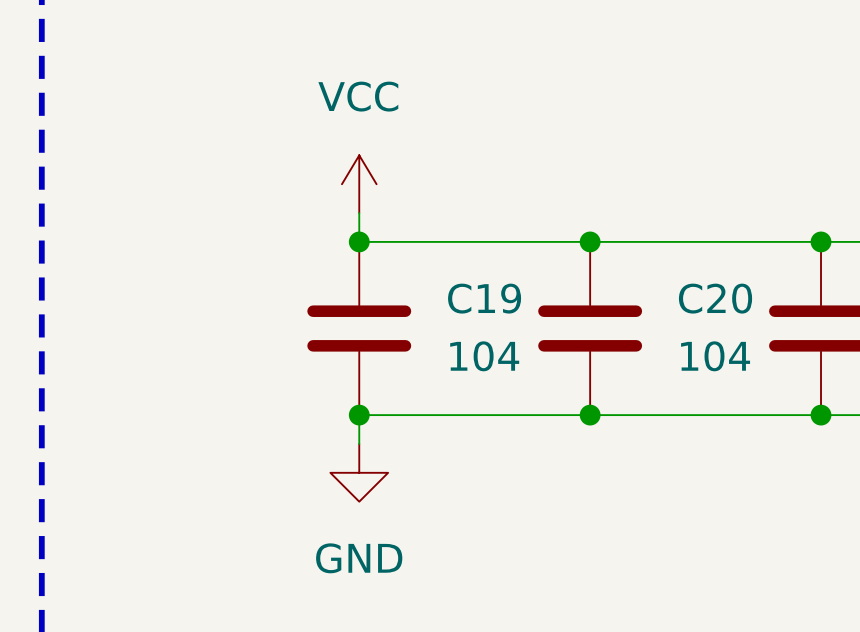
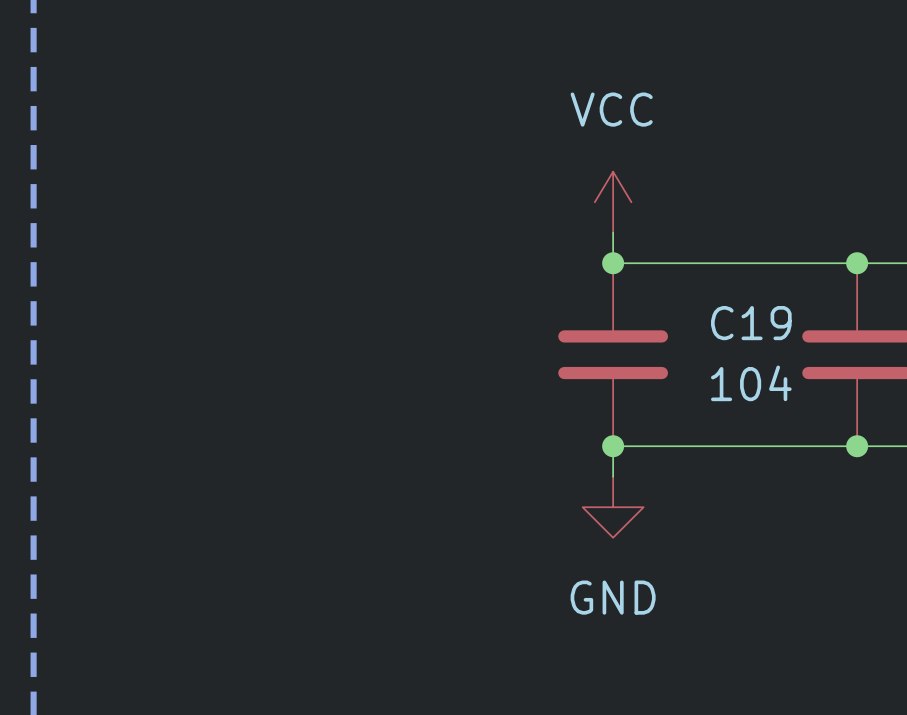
power symbol position: VCC (359, 184) -> VCC (613, 202)
wire: (359, 213) (359, 241) (590, 241) -> (613, 232) (613, 263)
junction: (359, 241) -> none
C20 name: C20 (715, 298) -> C19 (751, 323)
C19: 104 (359, 328) -> none
junction: (359, 415) -> none
wire: (590, 415) (359, 415) (359, 443) -> (613, 446) (613, 476)
power symbol position: GND (359, 472) -> GND (613, 507)

